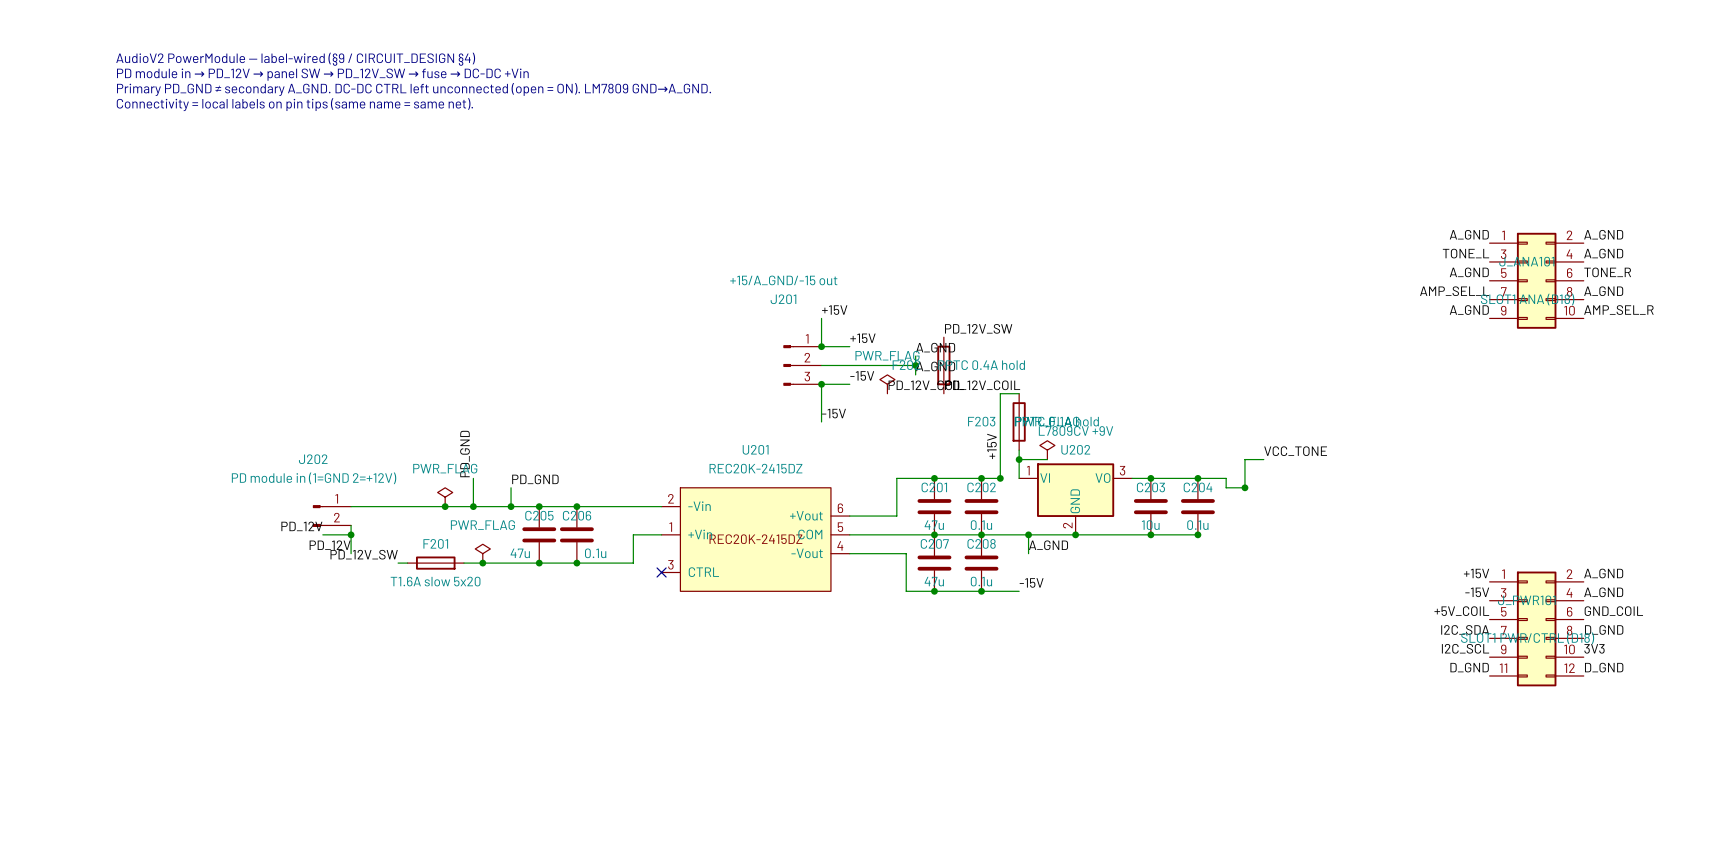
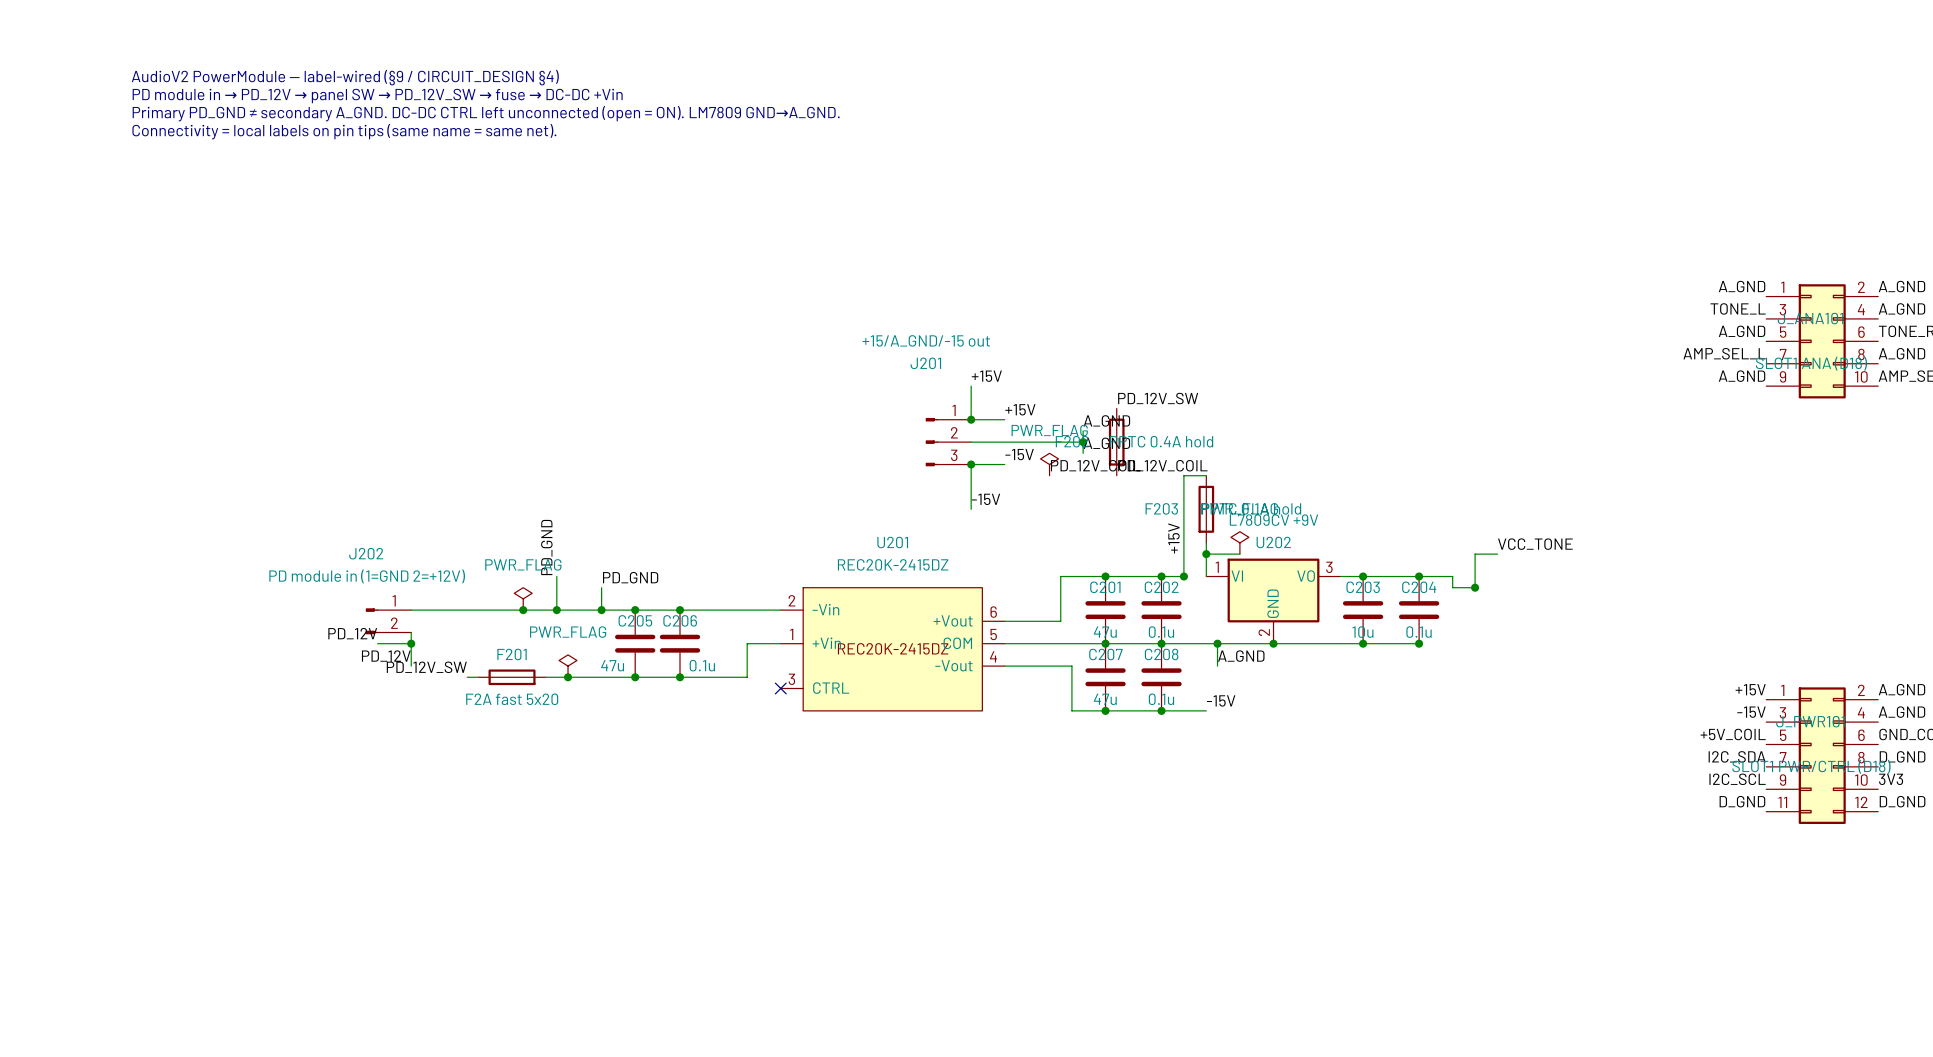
F201 value: T1.6A slow 5x20 (435, 581) -> F2A fast 5x20 (512, 699)

